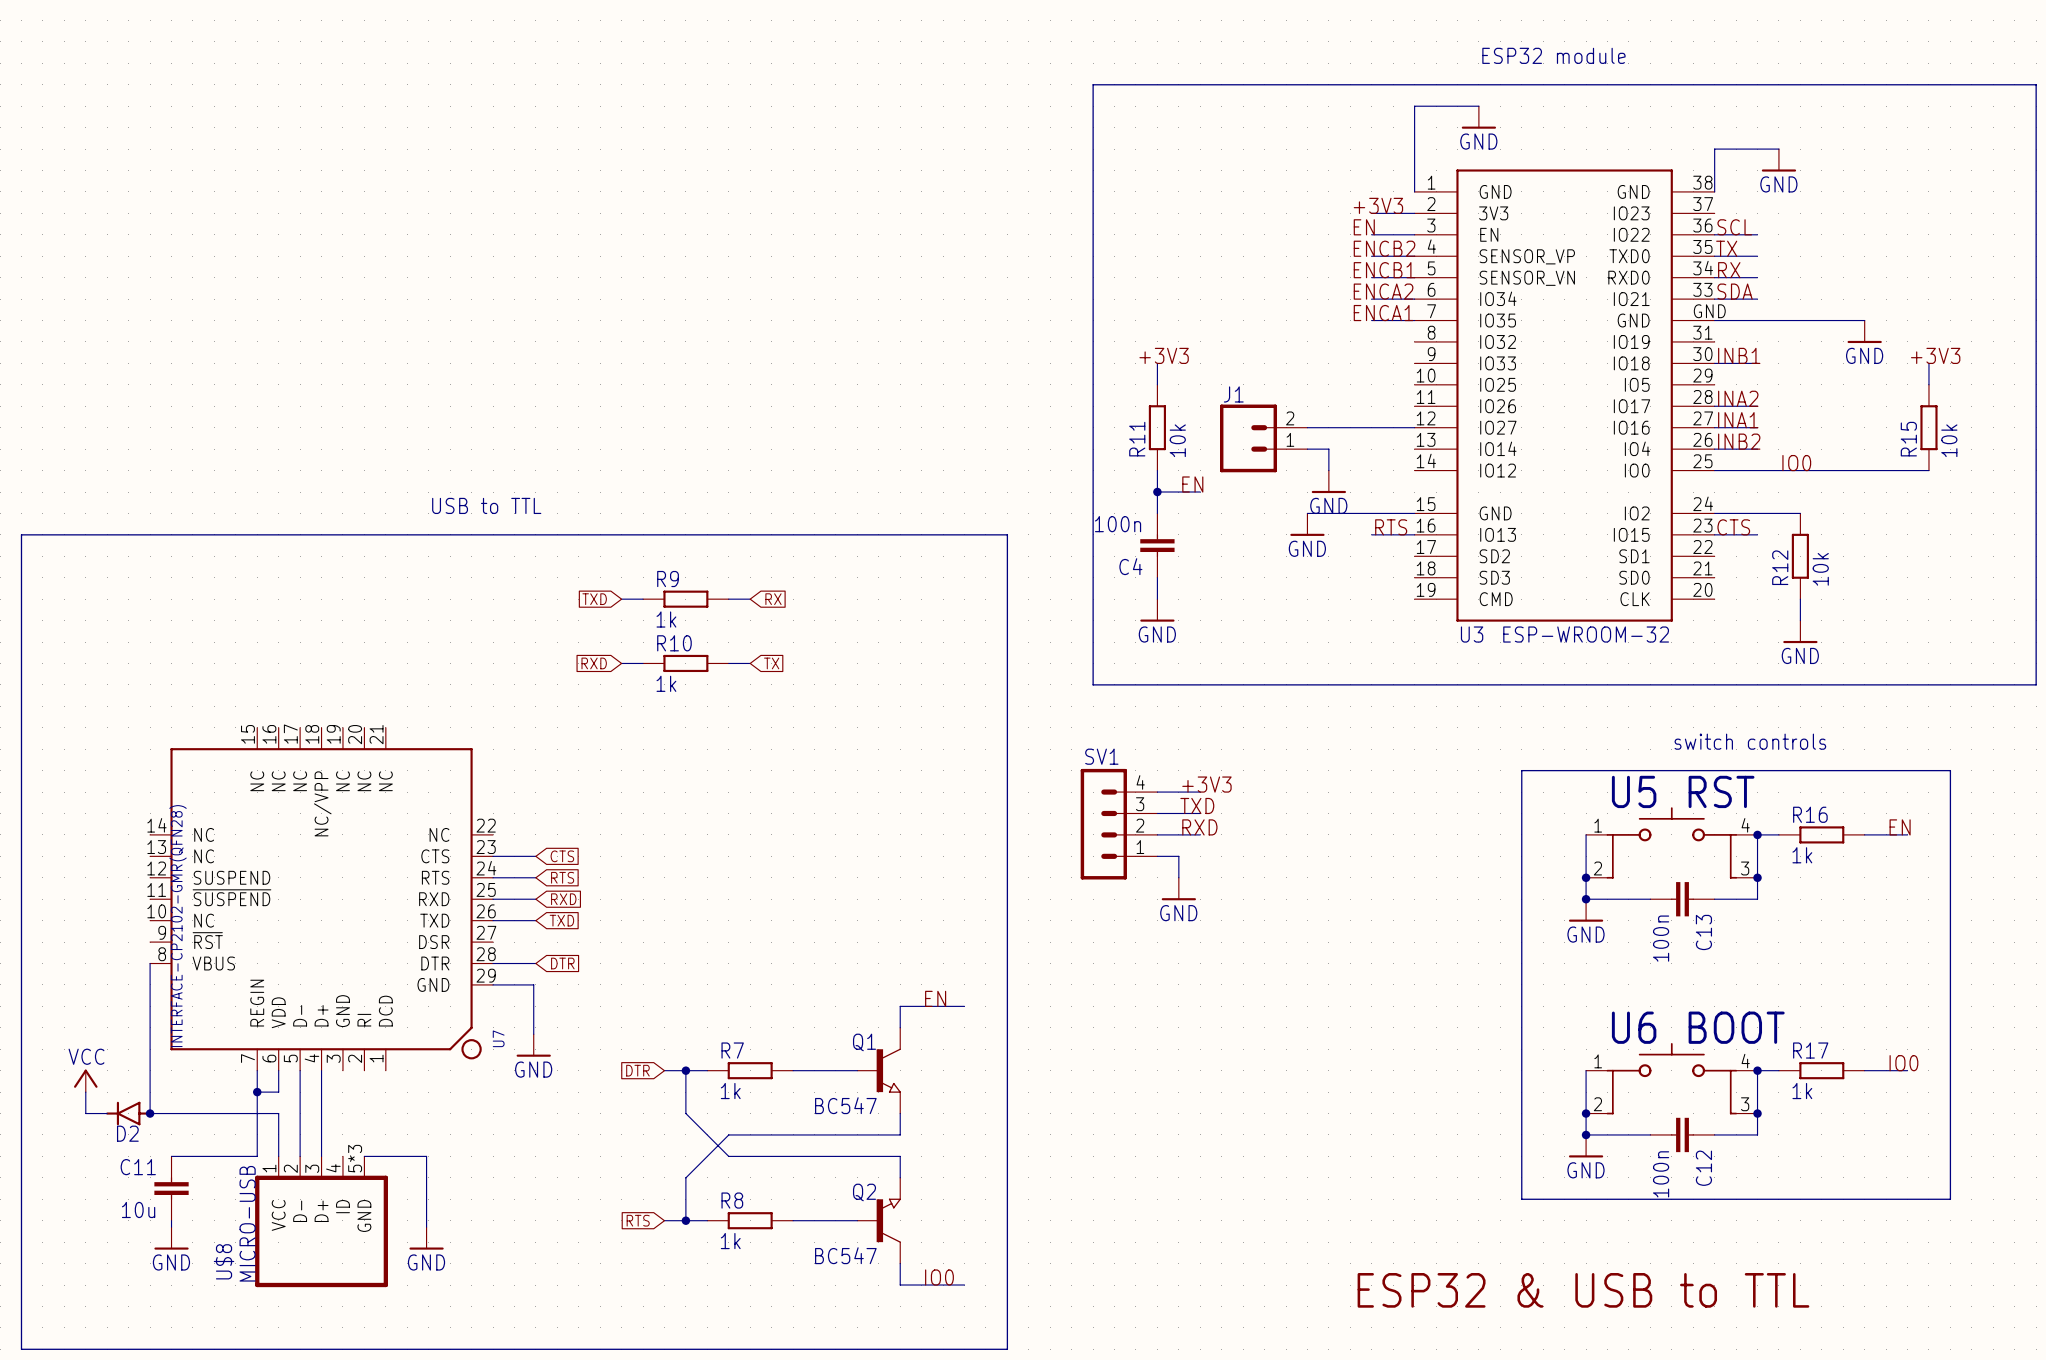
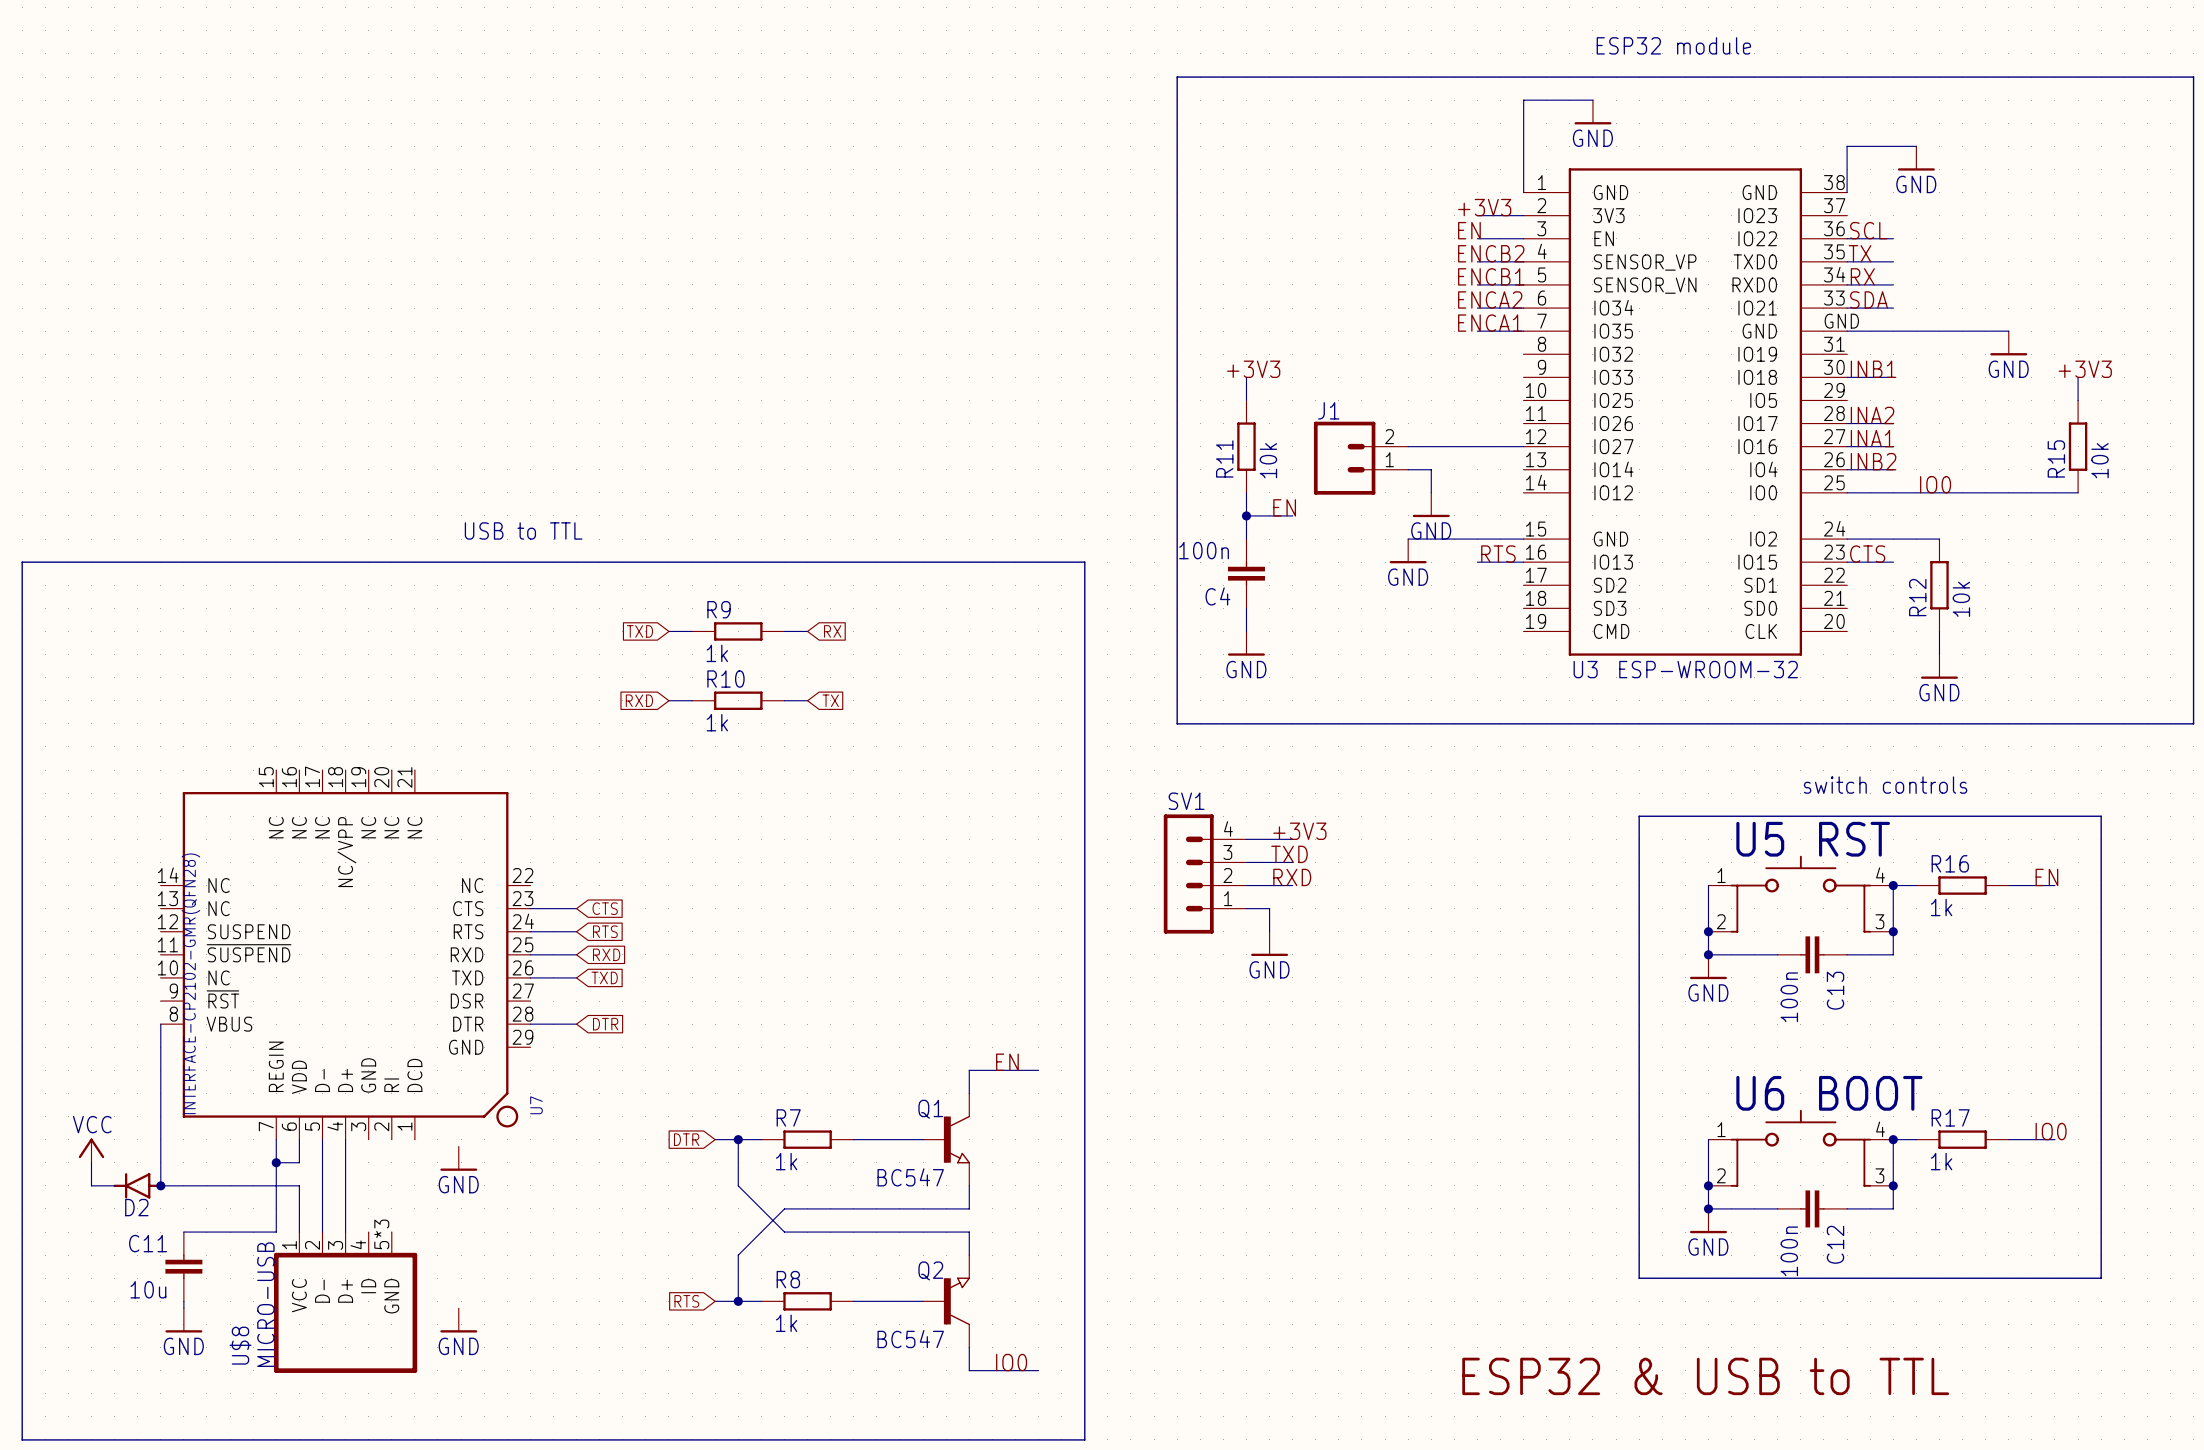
wire: (493, 984) (533, 984) (533, 1034) -> none
power symbol position: GND (533, 1045) -> GND (458, 1158)
wire: (364, 1156) (426, 1156) (426, 1227) -> none

